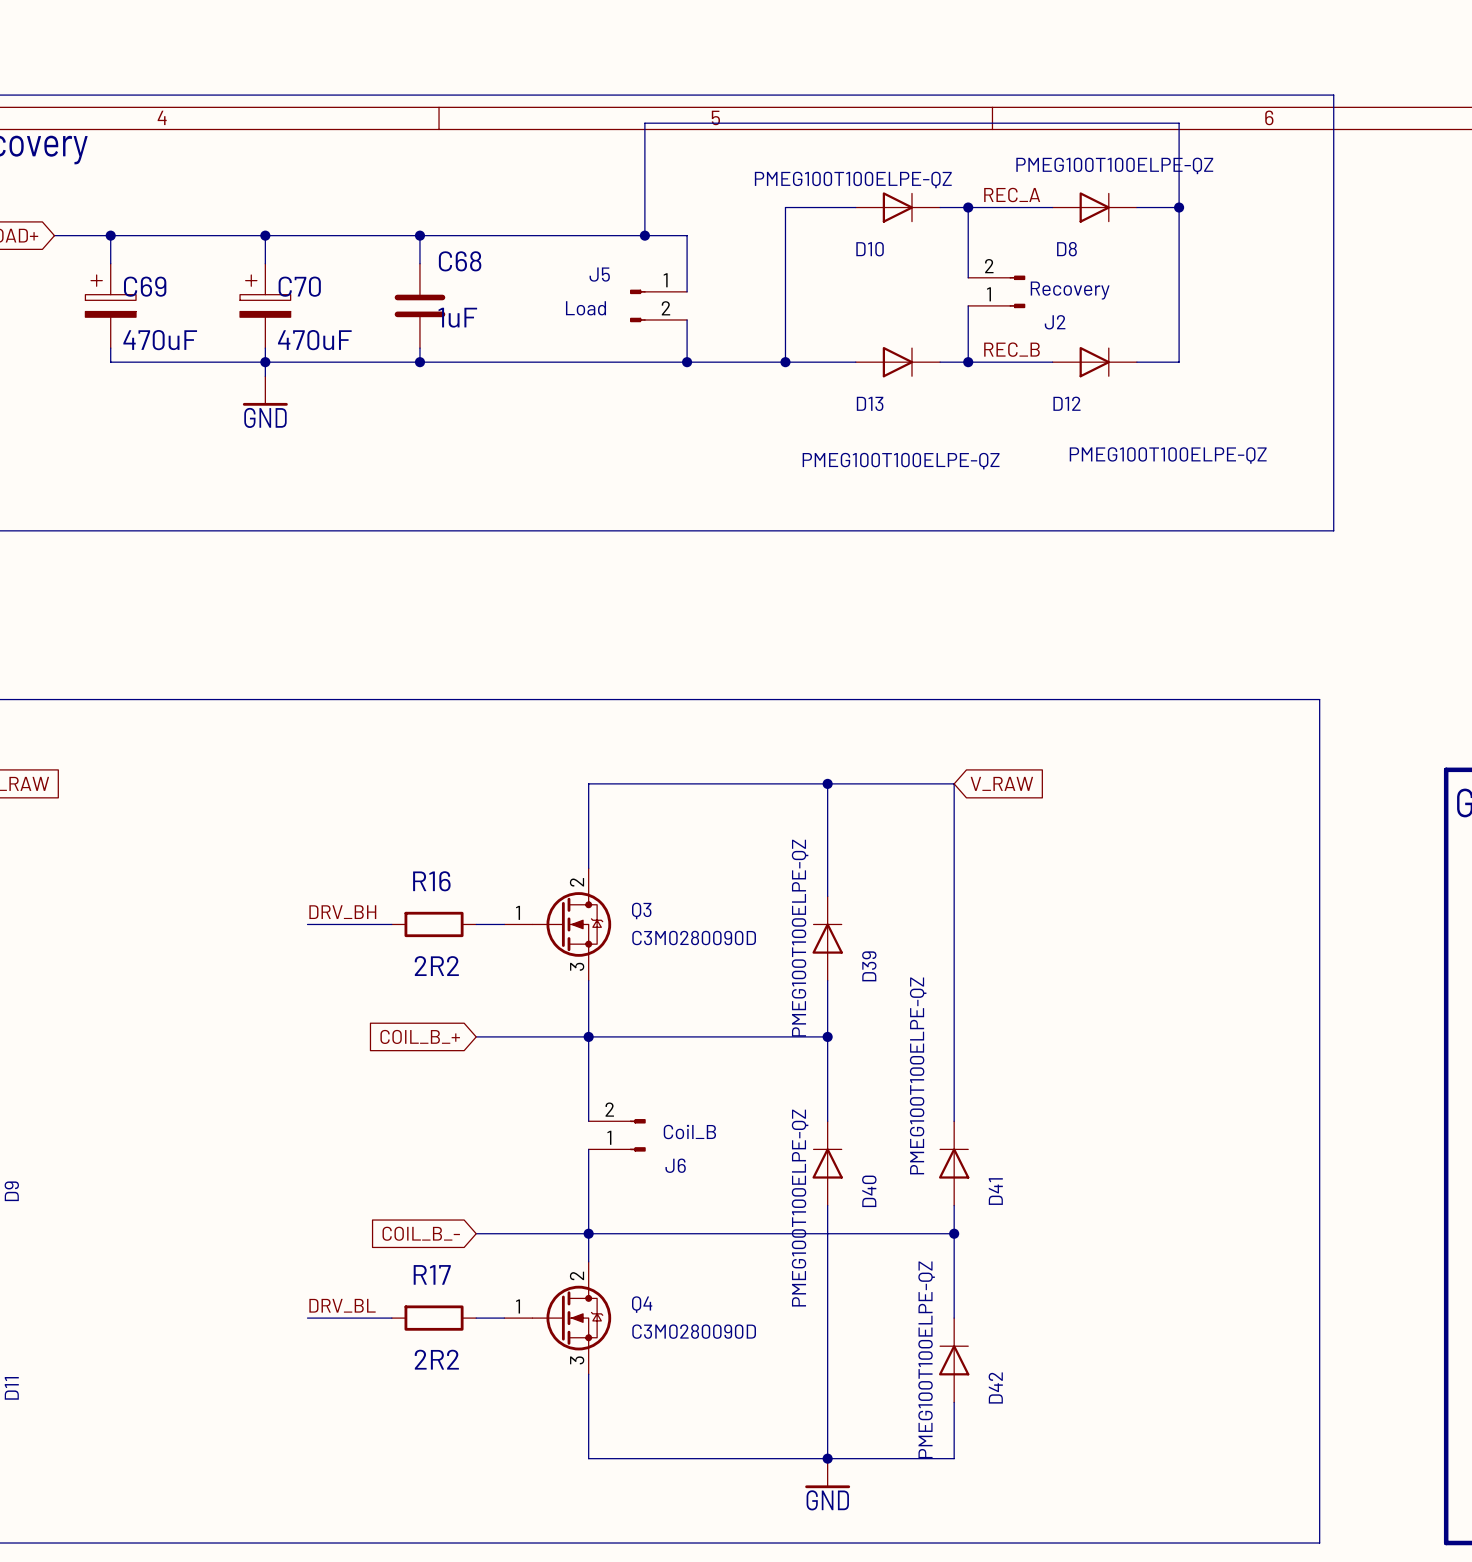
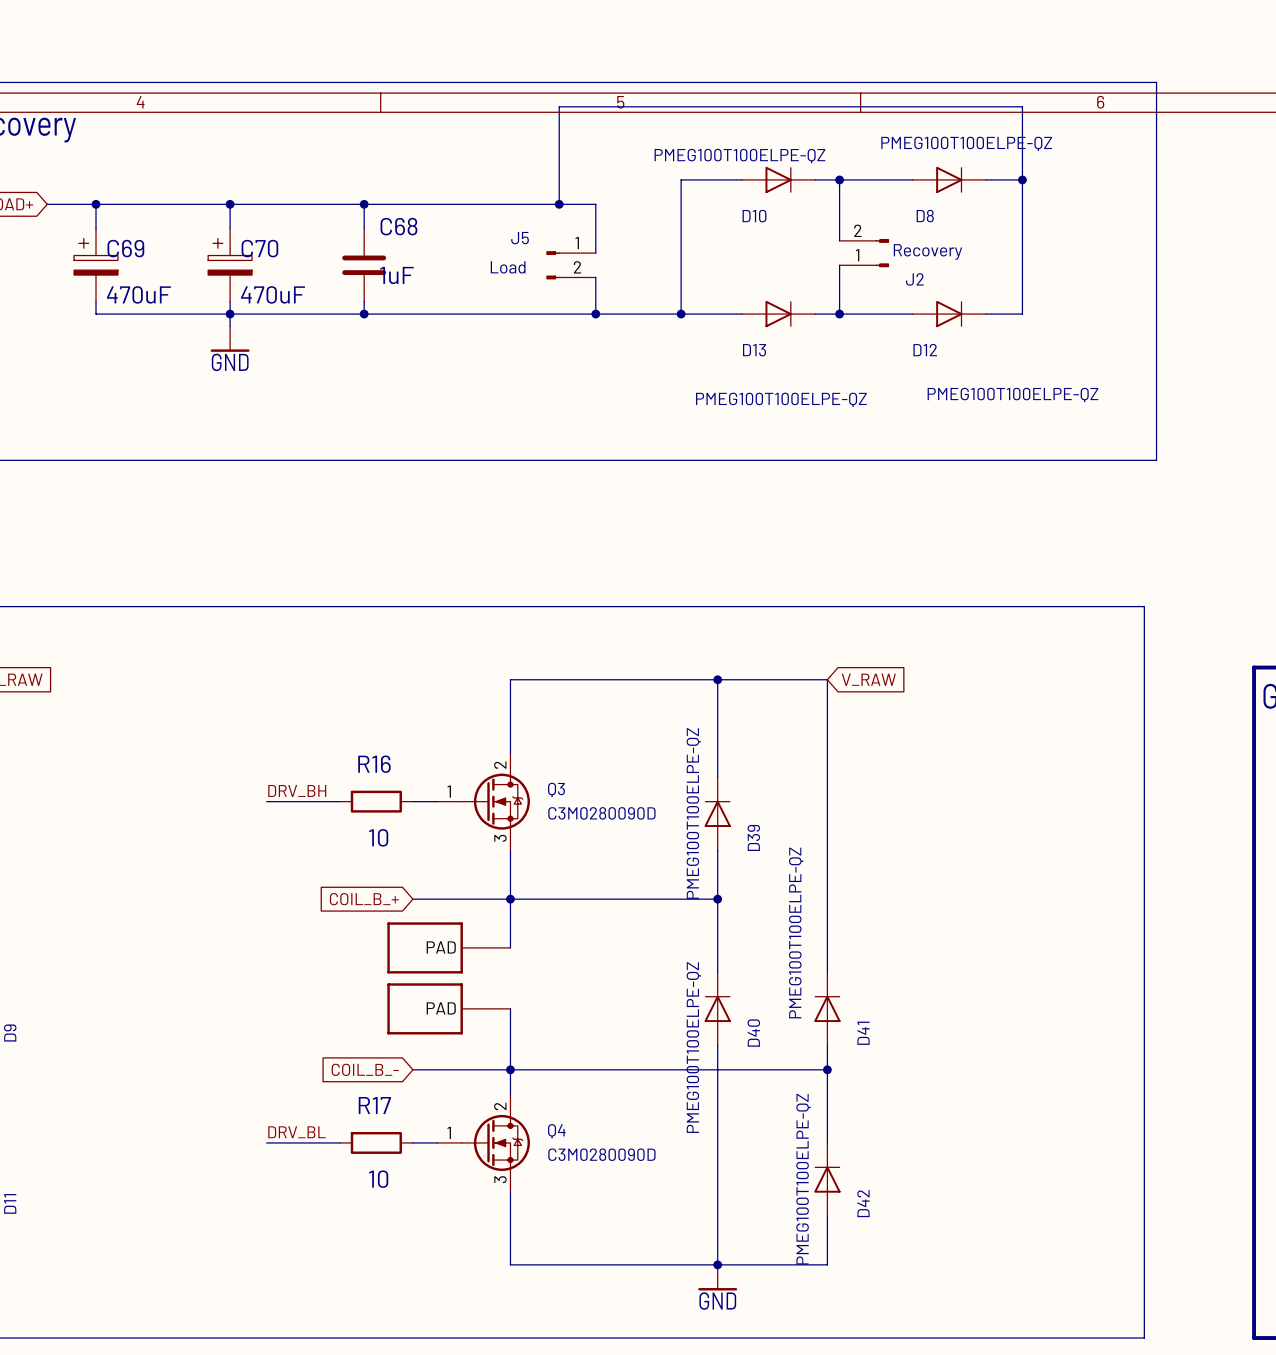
label: REC_A (1012, 194) -> none
label: REC_B (1011, 349) -> none
R16 value: 2R2 (436, 966) -> 10 (378, 837)
part: none -> (448, 947)
wire: (588, 1093) (588, 1121) -> none
J6: Coil_B (617, 1135) -> none
wire: (588, 1149) (588, 1163) -> none
part: none -> (448, 1008)
R17 value: 2R2 (436, 1359) -> 10 (378, 1179)

